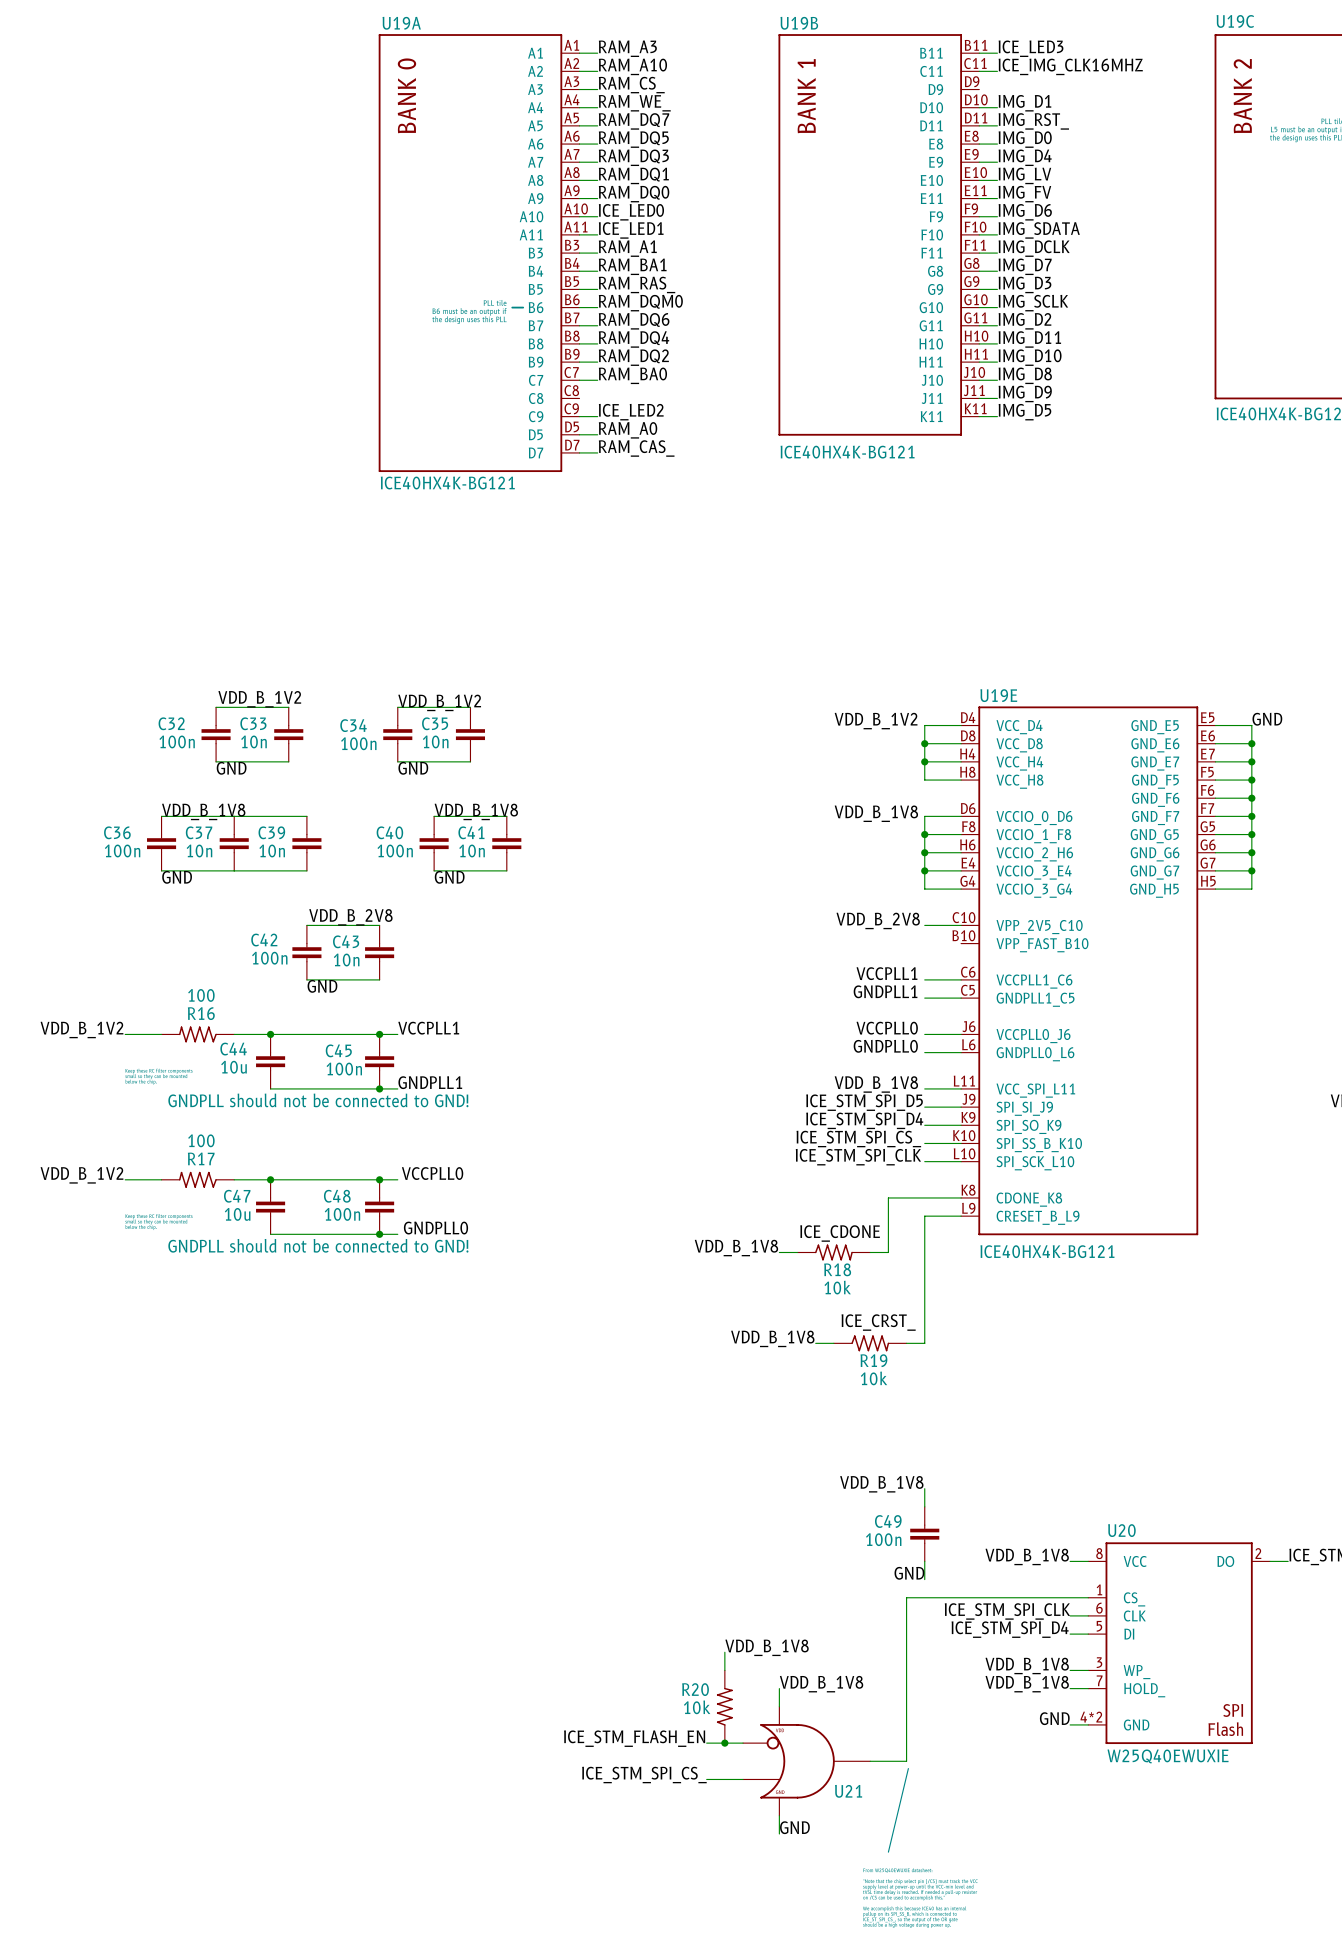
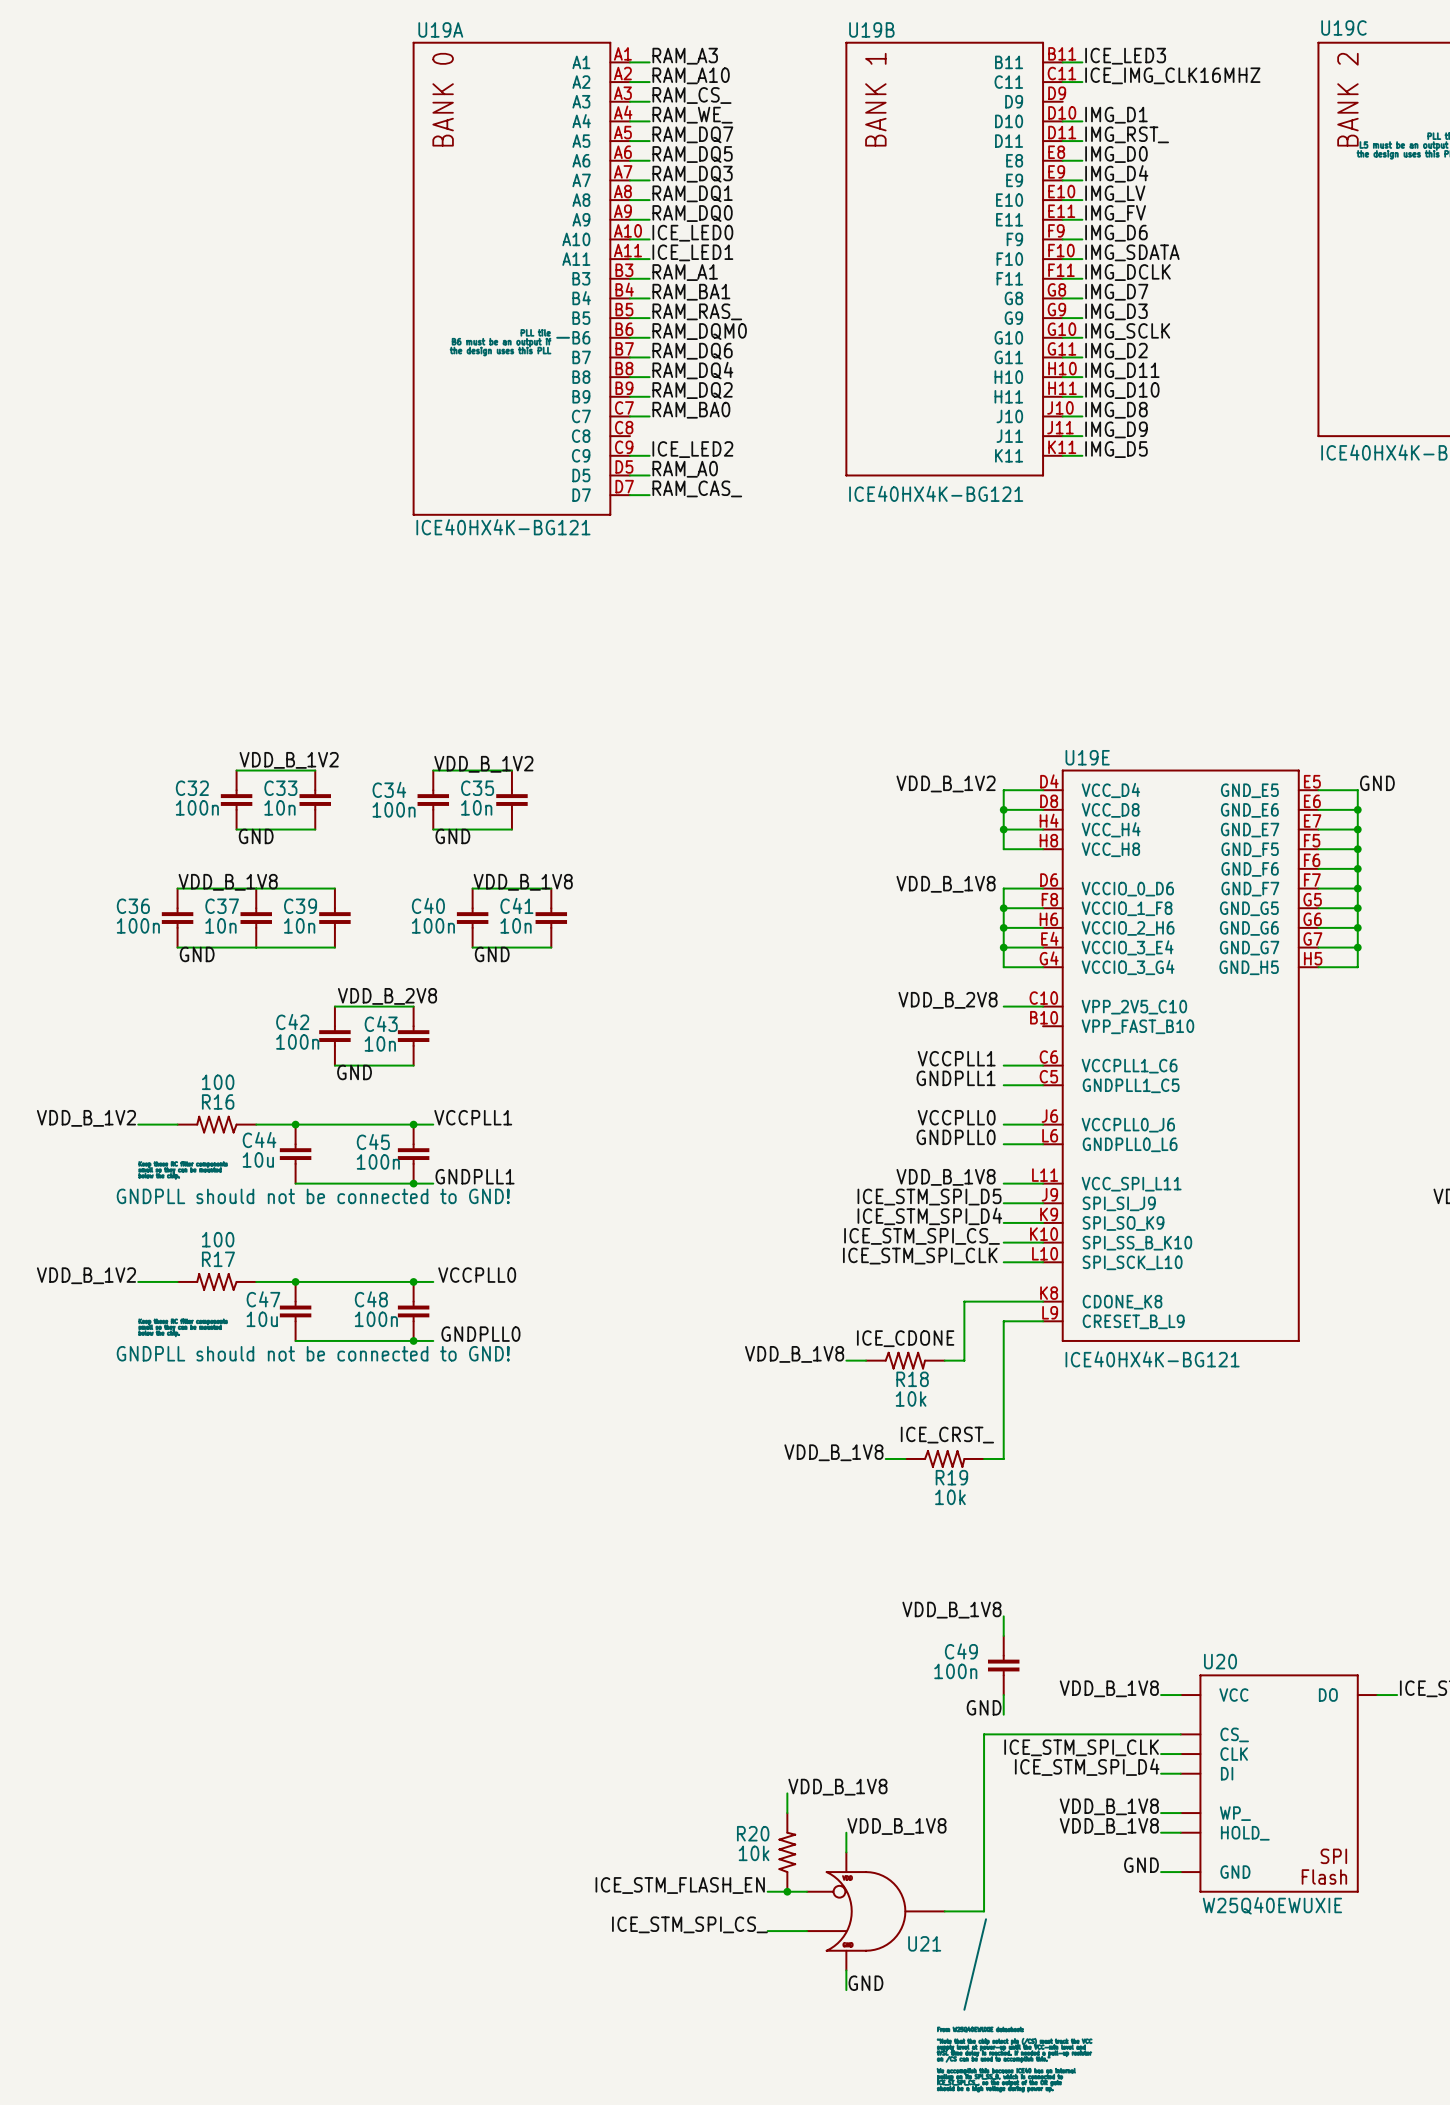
U20 pin number: 8 (1099, 1553) -> none
U20 pin number: 2 (1258, 1553) -> none
U20 pin number: 1 (1099, 1589) -> none
U20 pin number: 6 (1099, 1608) -> none
U20 pin number: 5 (1099, 1626) -> none
U20 pin number: 3 (1099, 1662) -> none
U20 pin number: 7 (1099, 1680) -> none
U20 pin number: 4*2 (1091, 1717) -> none

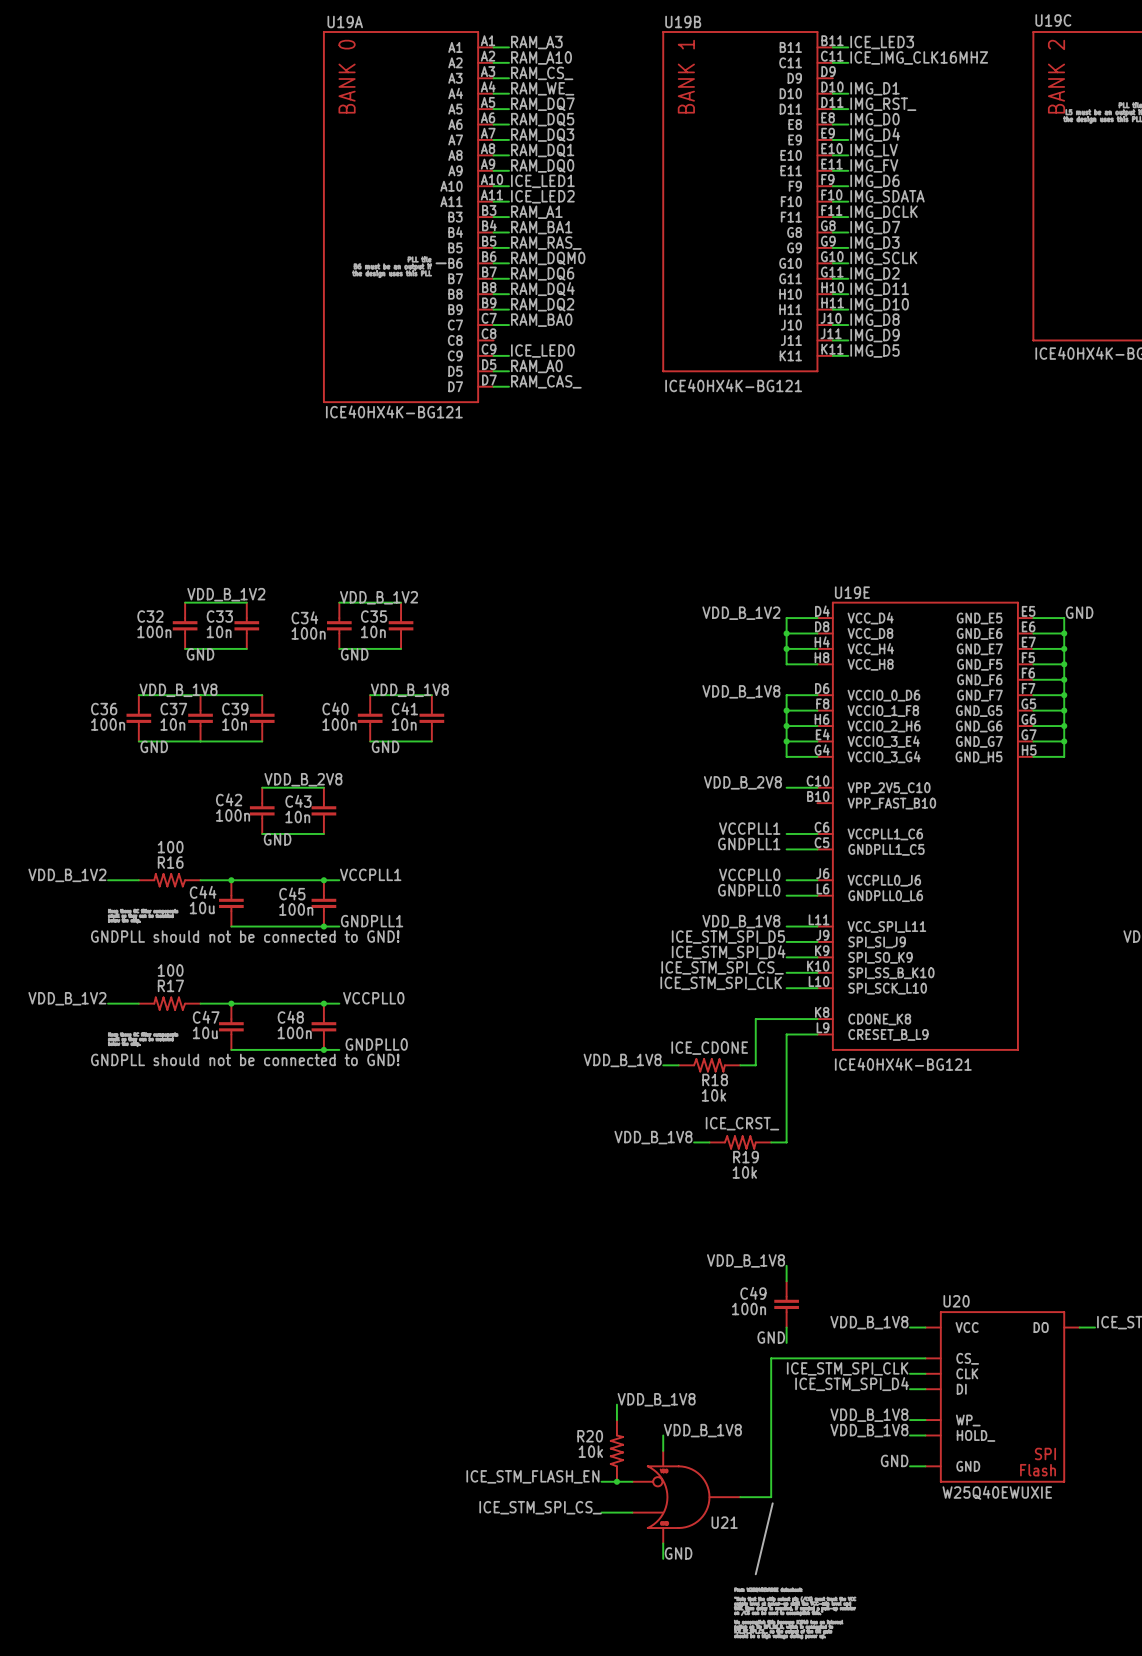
label: ICE_LED0 (692, 233) -> ICE_LED1 (542, 181)
label: ICE_LED1 (692, 252) -> ICE_LED2 (542, 196)
label: ICE_LED2 (692, 449) -> ICE_LED0 (542, 351)

